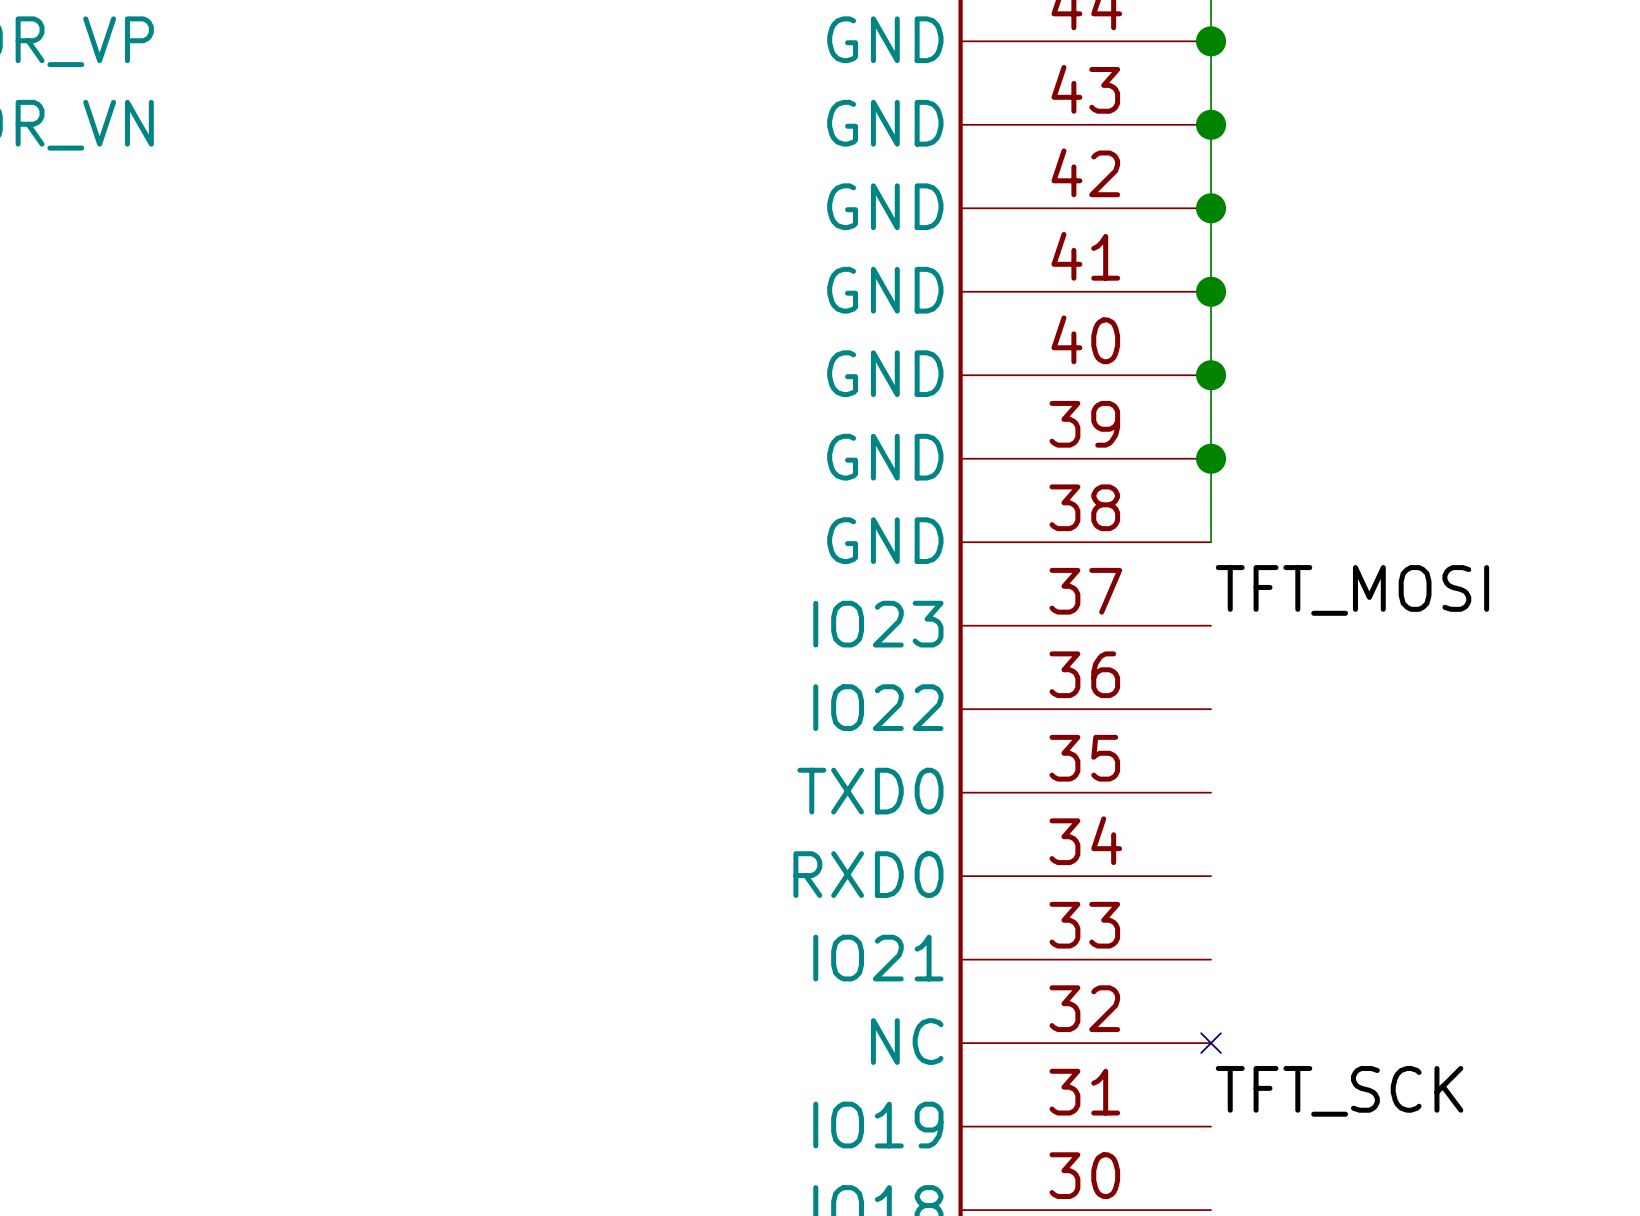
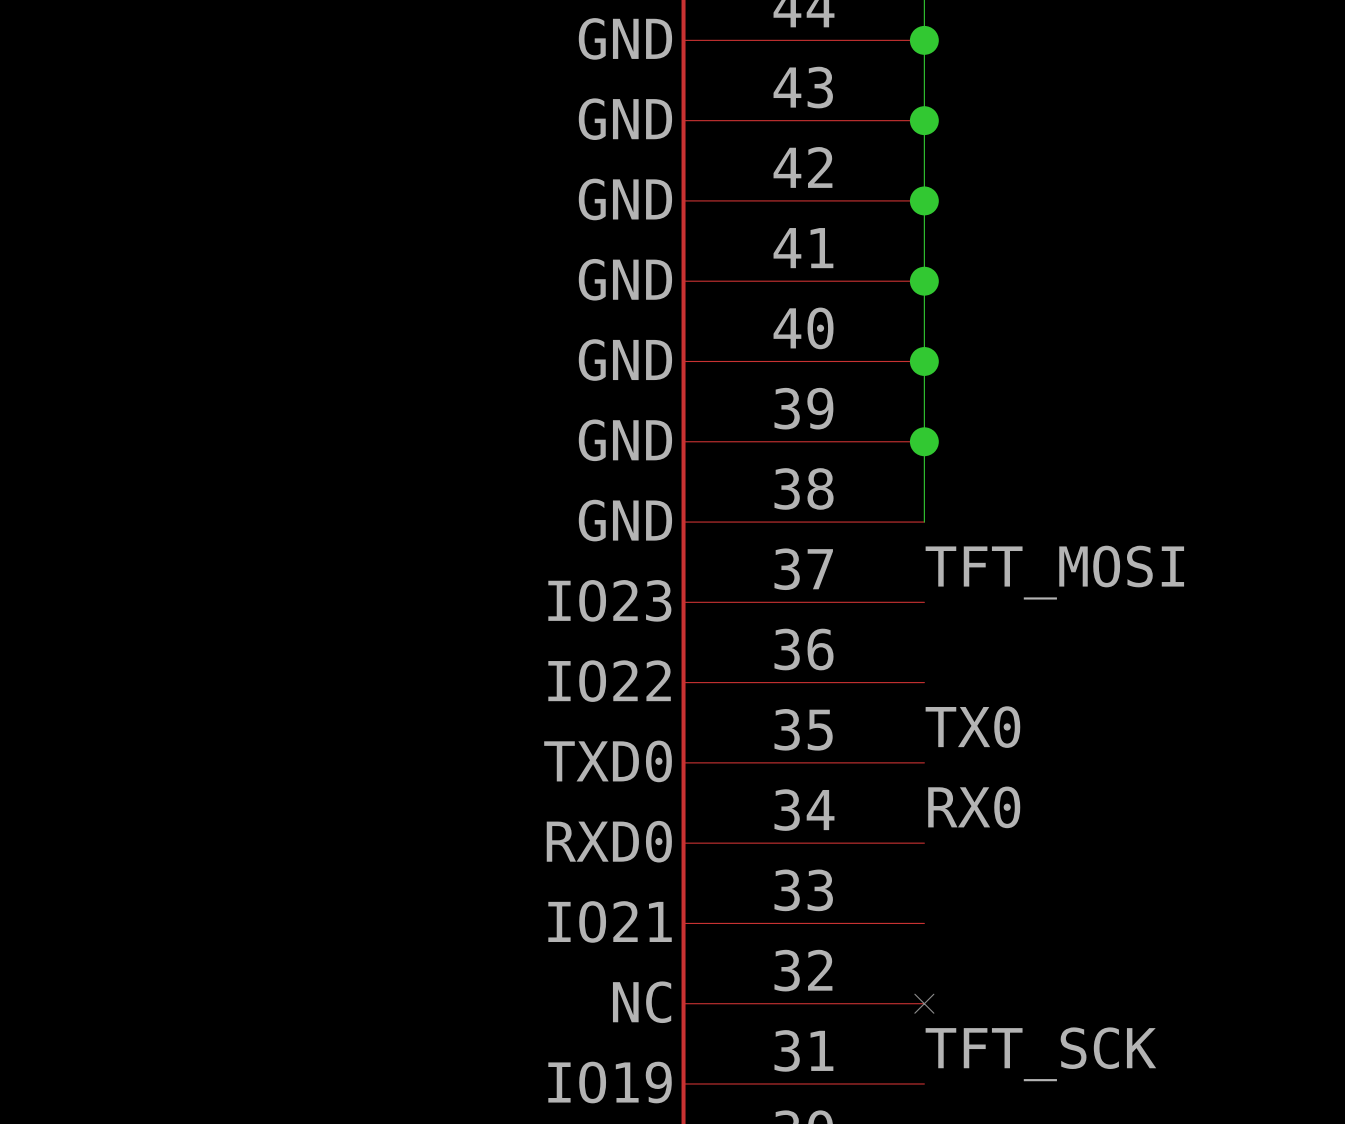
label: none -> TX0 (972, 727)
label: none -> RX0 (974, 807)

